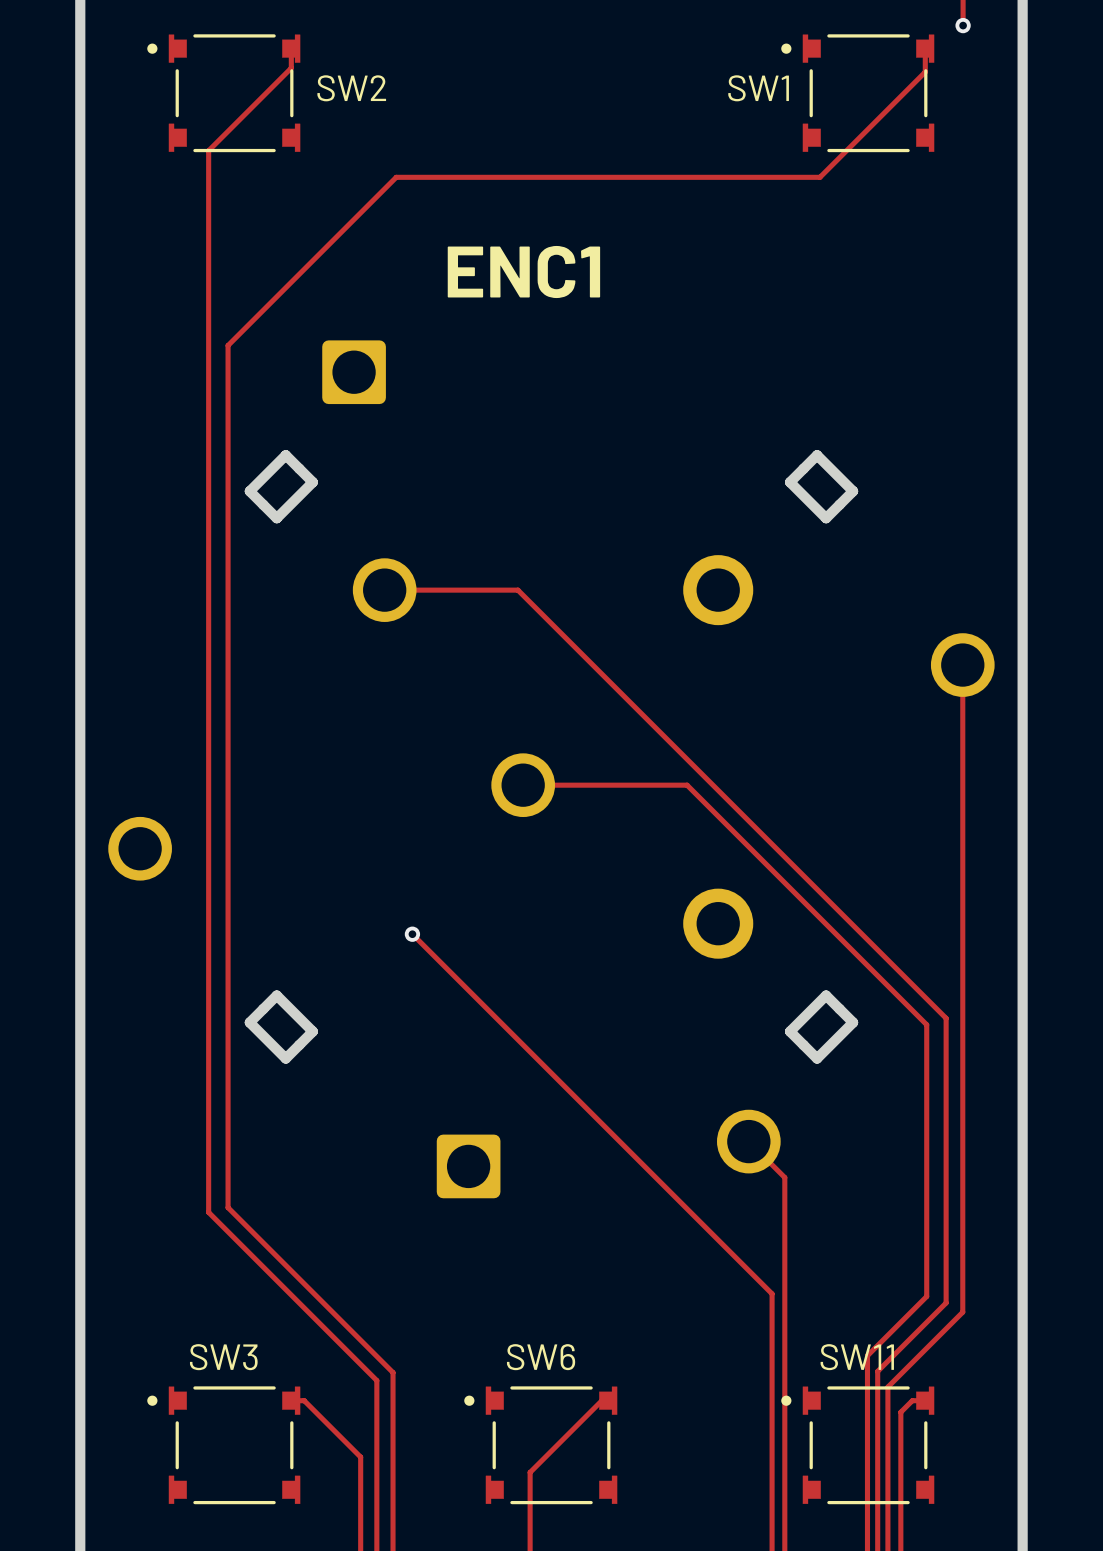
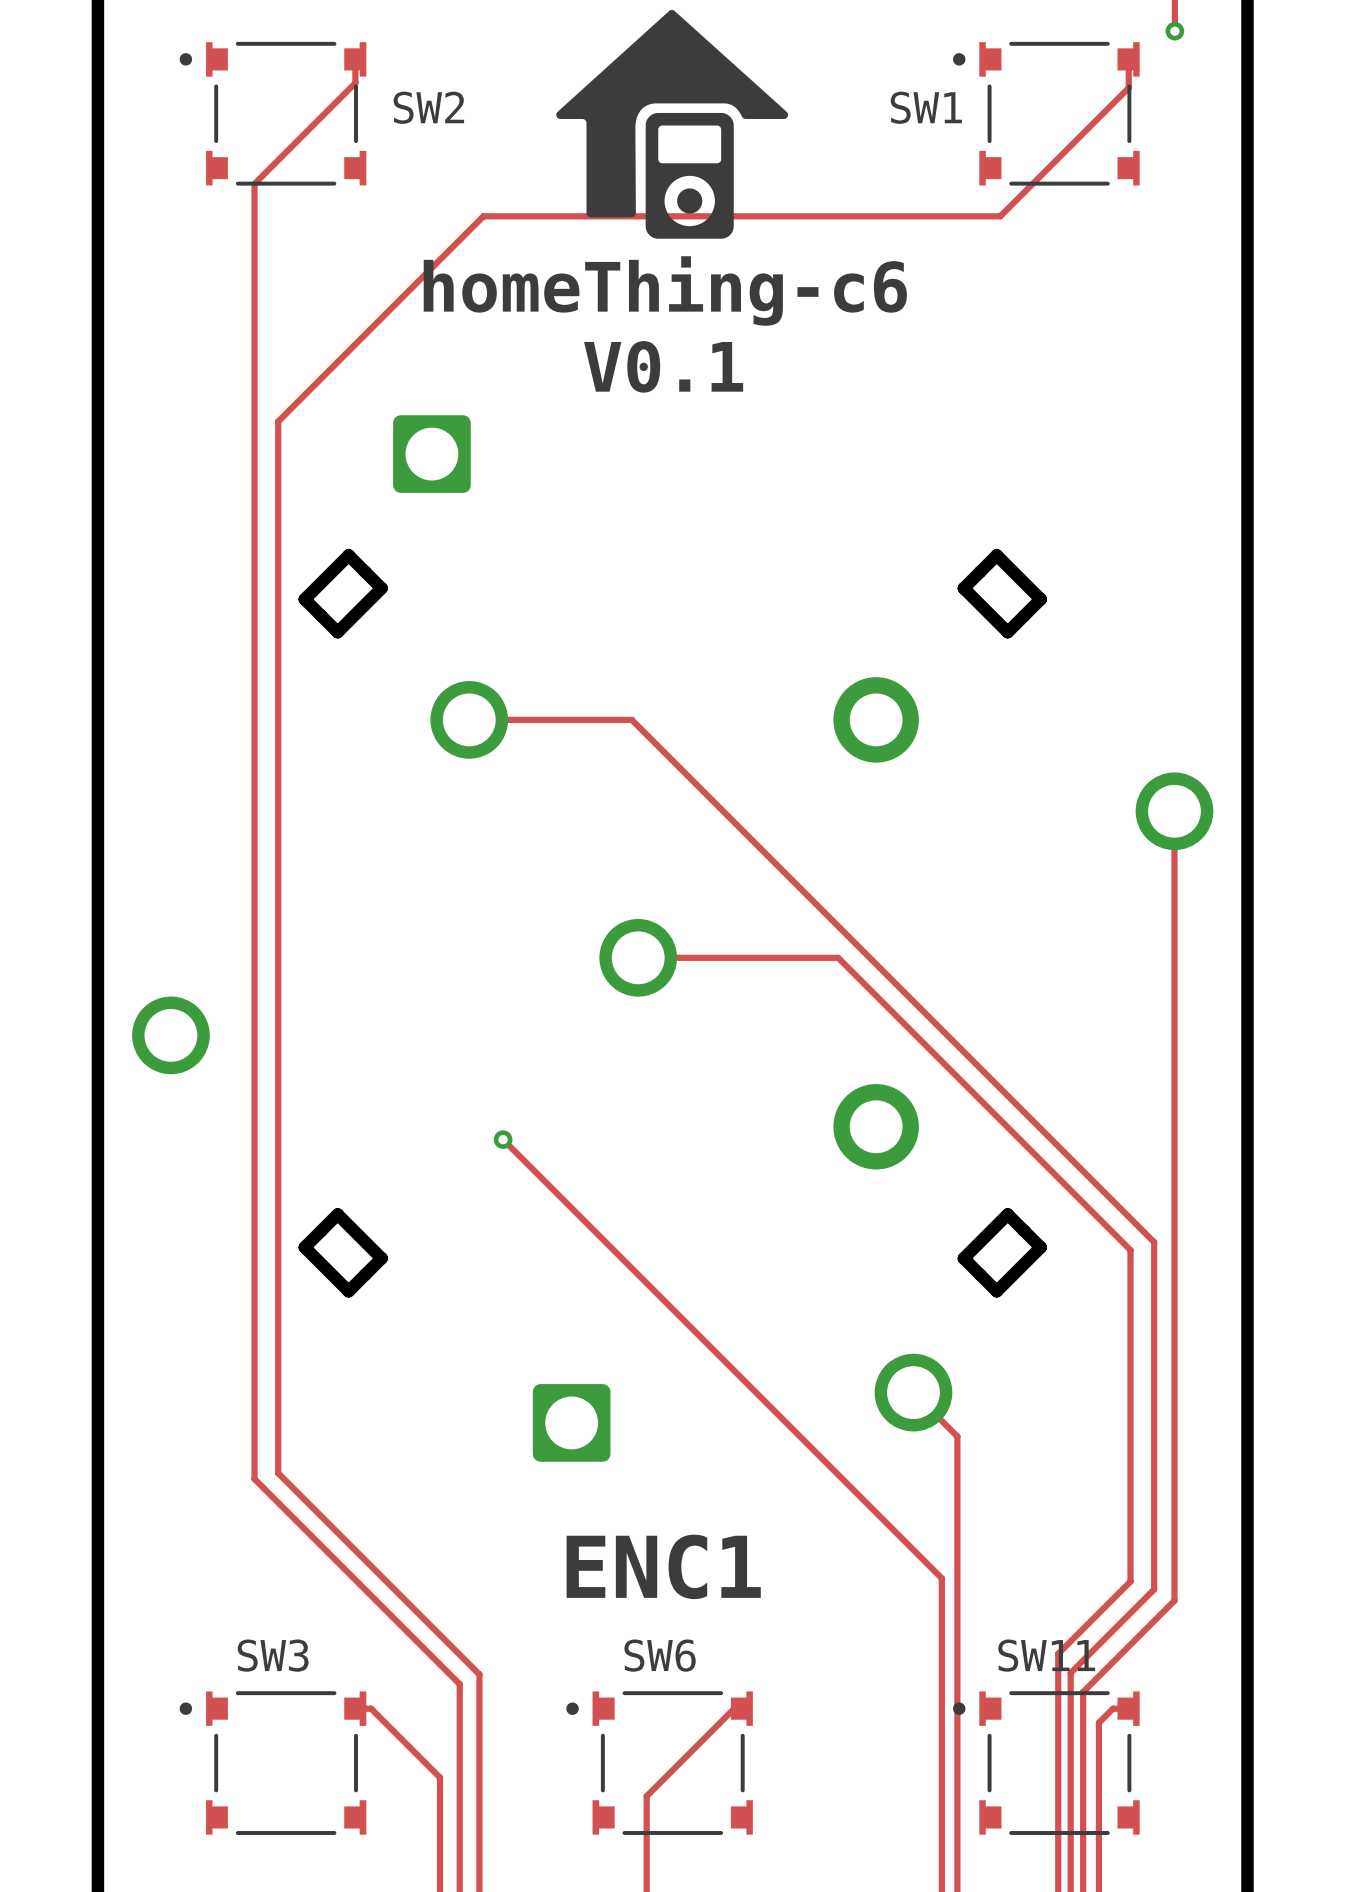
drawing: none -> [556, 9, 788, 239]
text: none -> homeThing-c6 (665, 290)
ENC1 name position: ENC1 (523, 272) -> ENC1 (663, 1566)
text: none -> V0.1 (663, 366)

